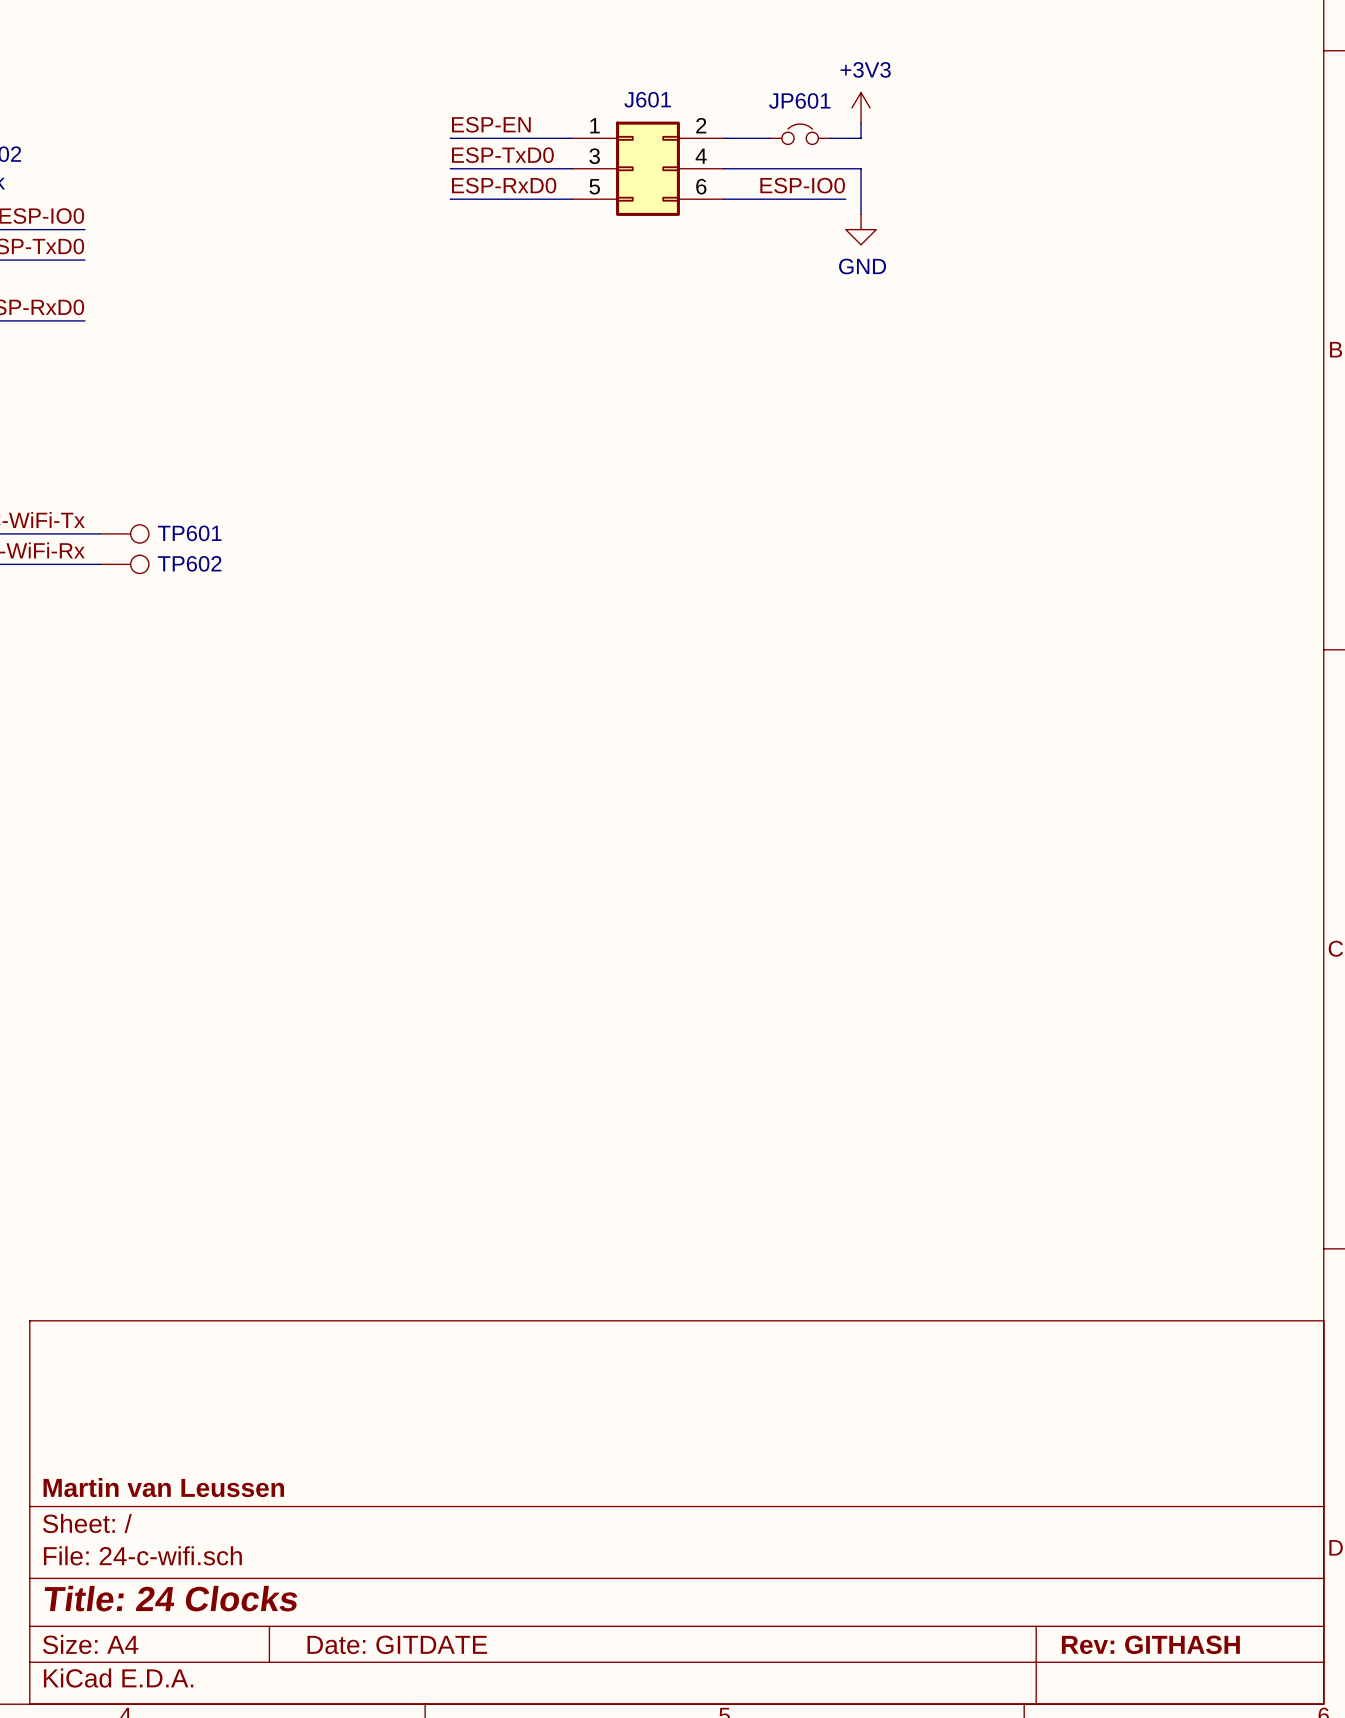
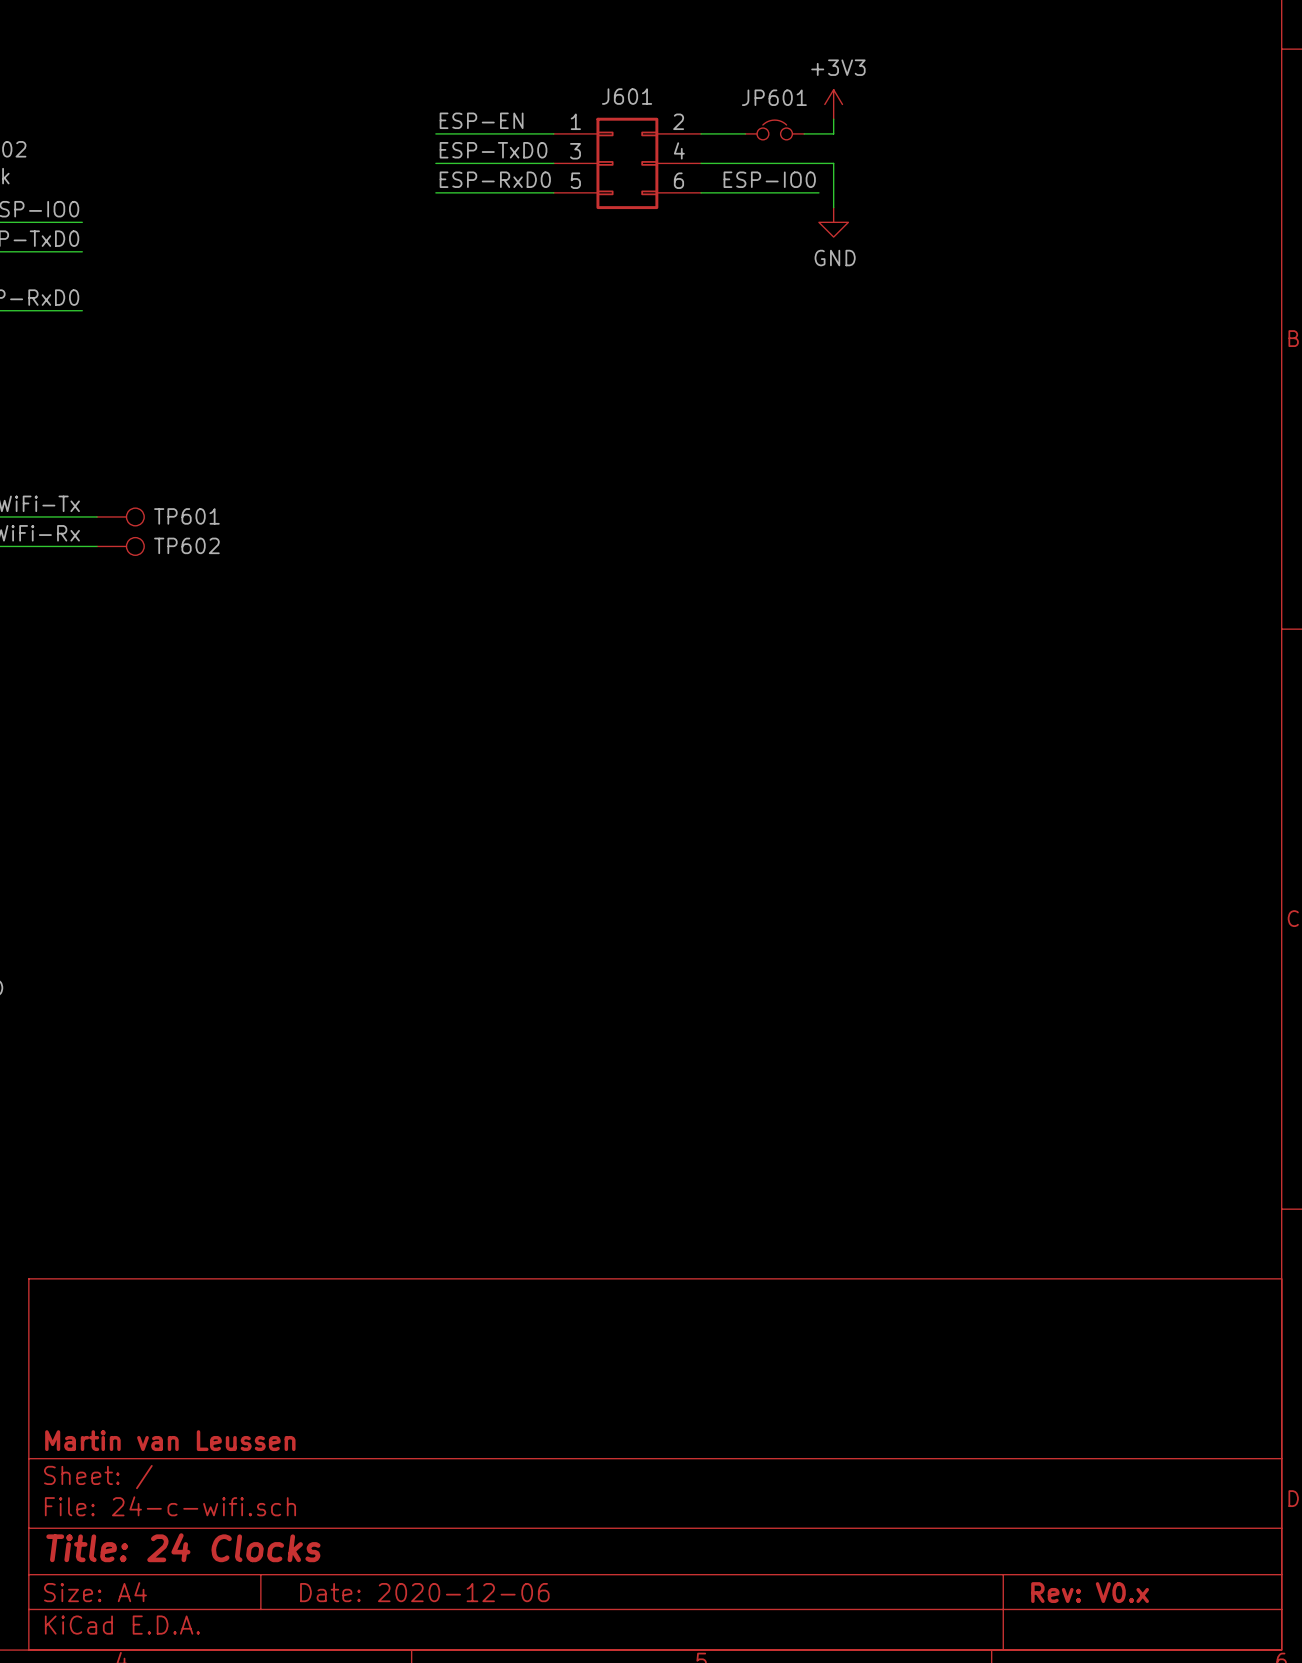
title block: Date: GITDATE (397, 1644) -> Date: 2020-12-06 (424, 1592)
title block: Rev: GITHASH (1150, 1644) -> Rev: V0.x (1090, 1592)

